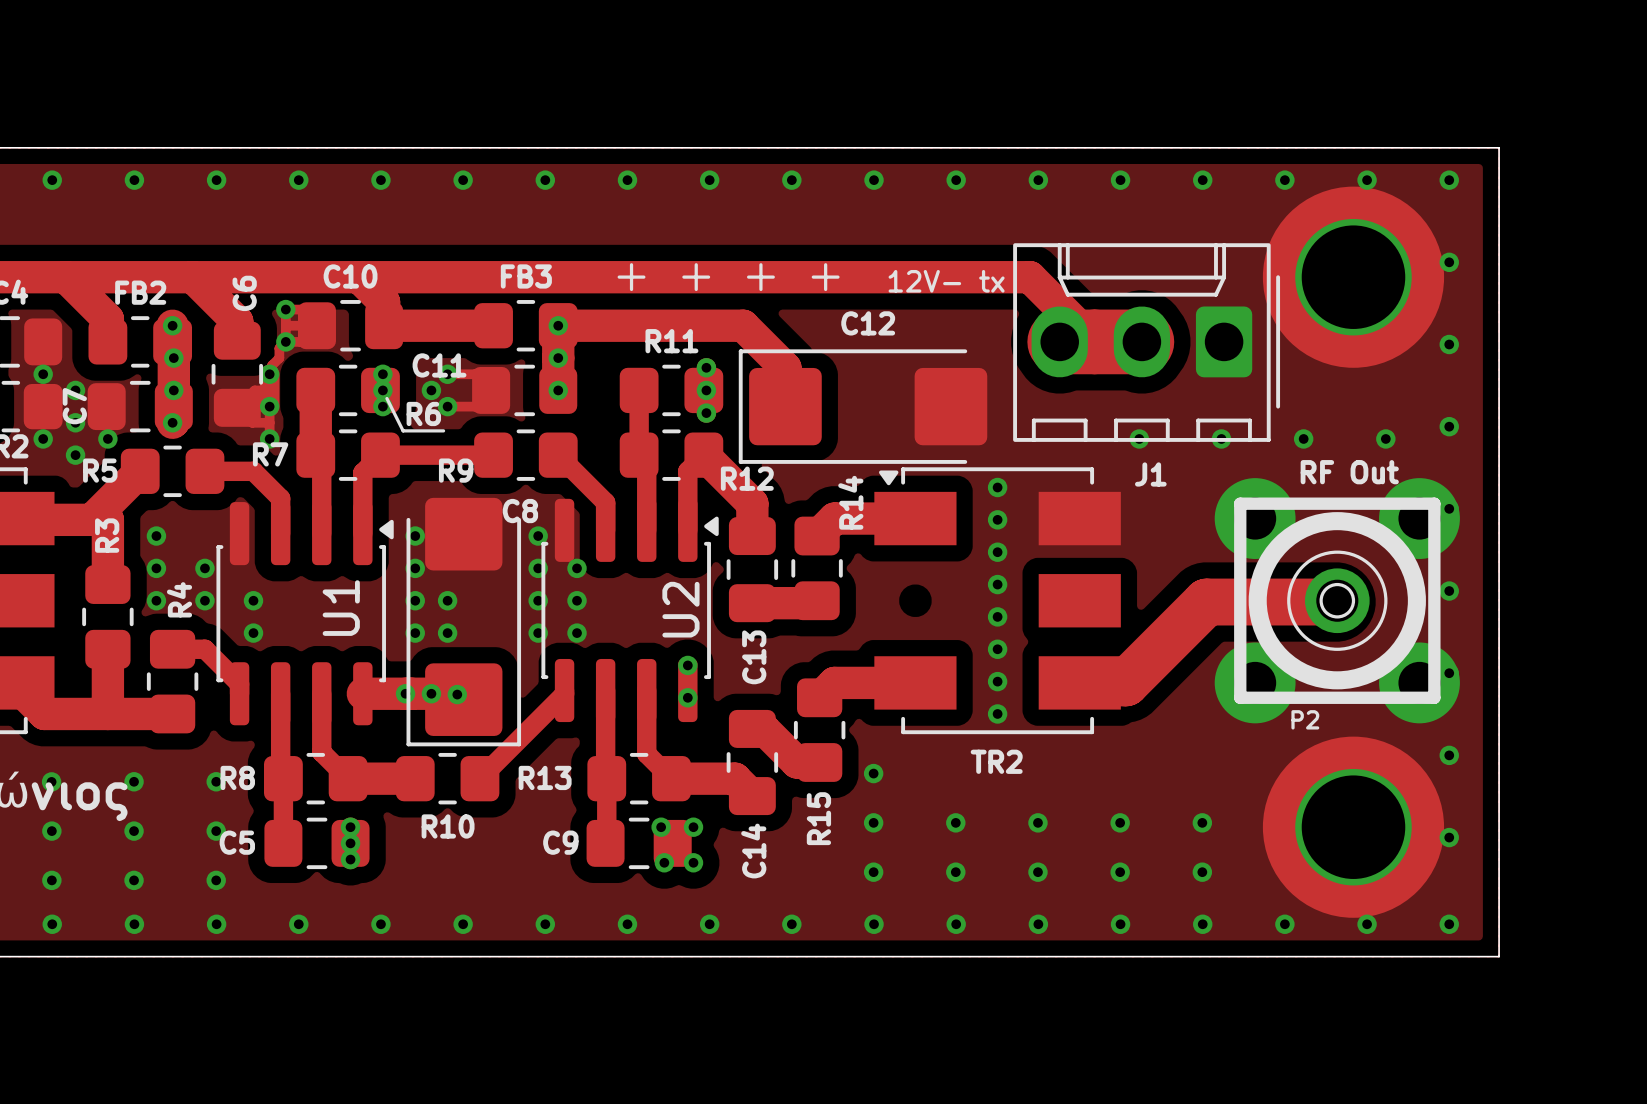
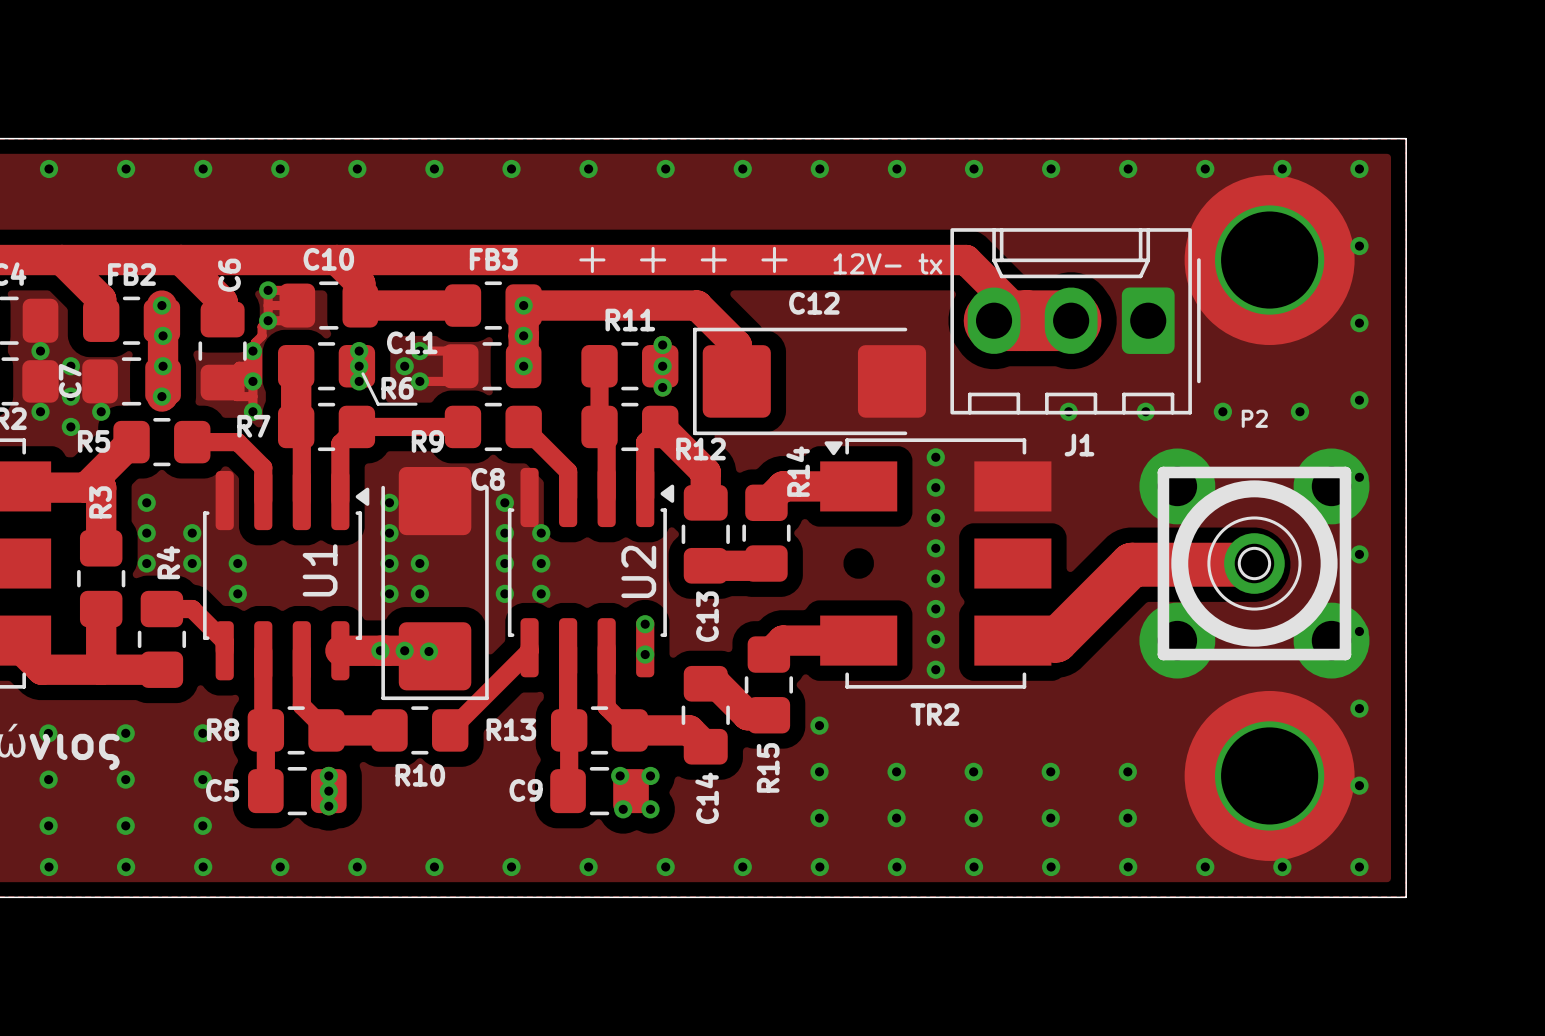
text: RF Out (1349, 472) -> none
P2 name position: P2 (1305, 719) -> P2 (1254, 418)

